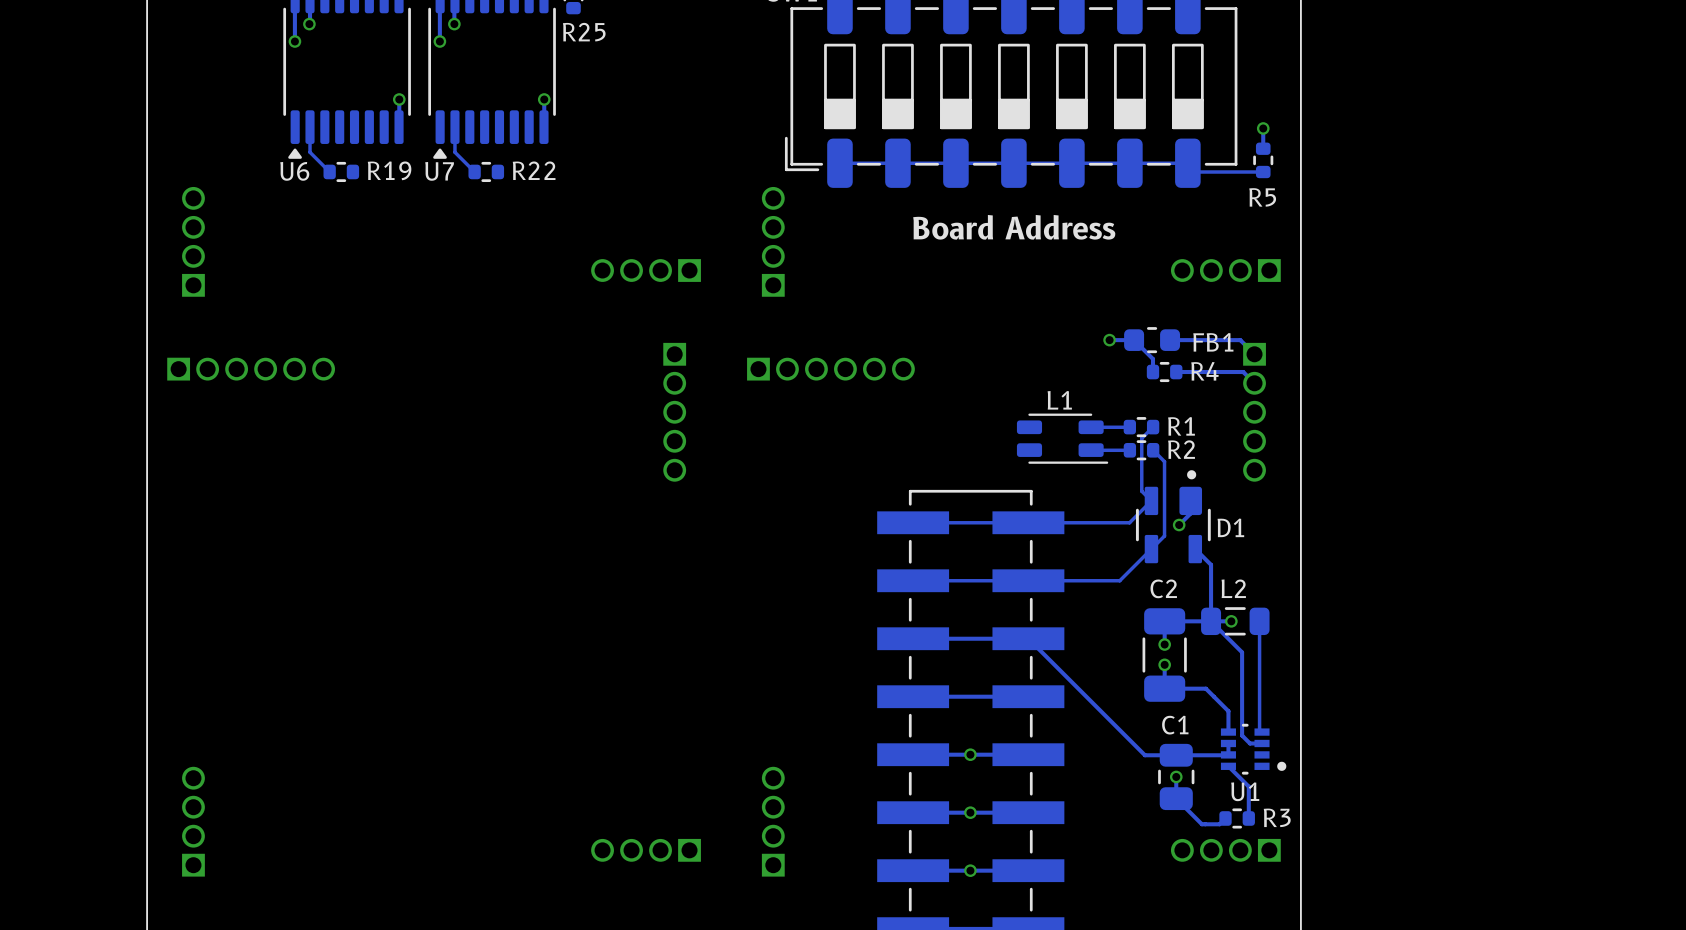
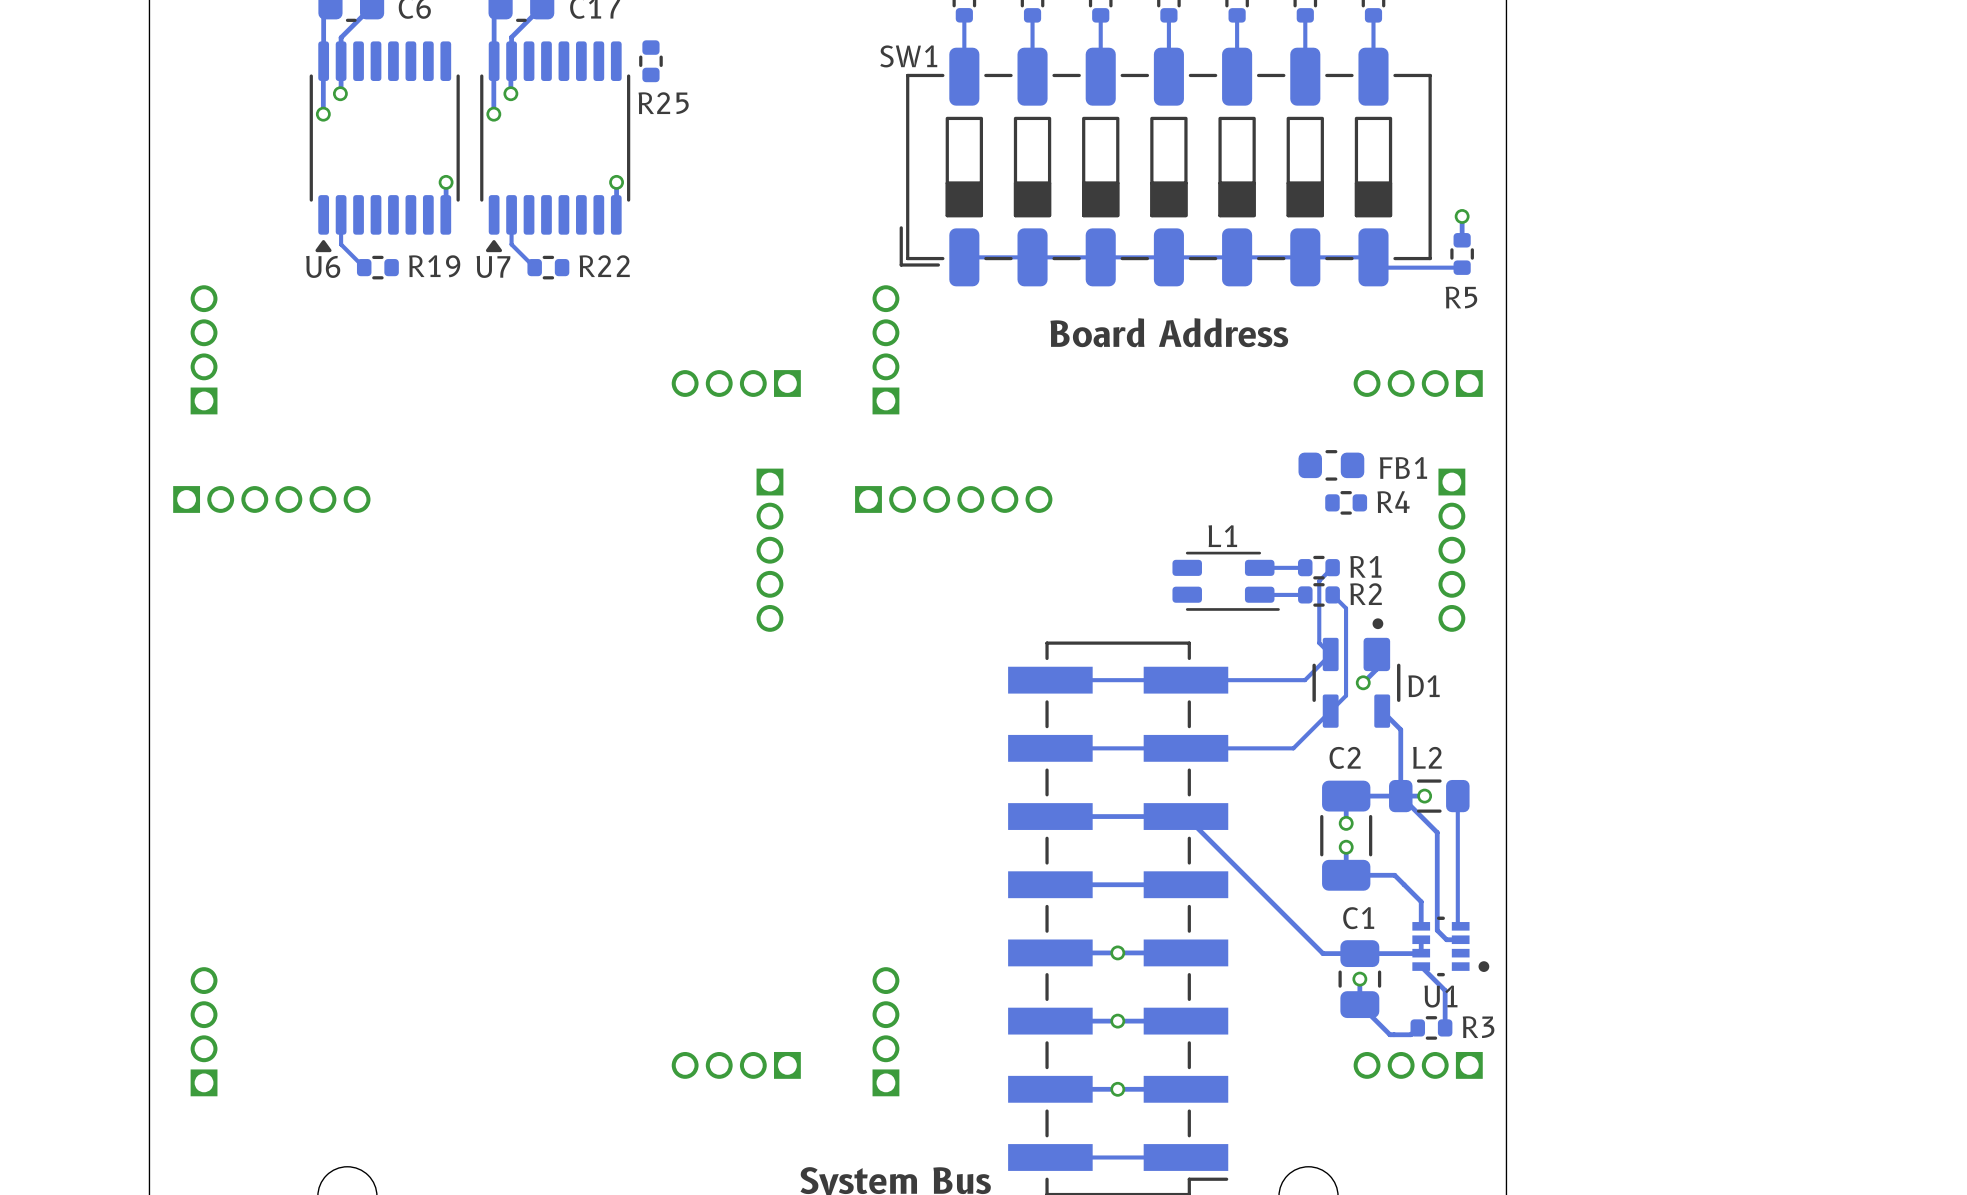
track: (1109, 340) (1134, 340) (1152, 359) (1152, 372) -> none
via: (1109, 340) -> none
track: (1170, 340) (1240, 340) (1254, 354) -> none
track: (1176, 372) (1243, 372) (1254, 383) -> none

